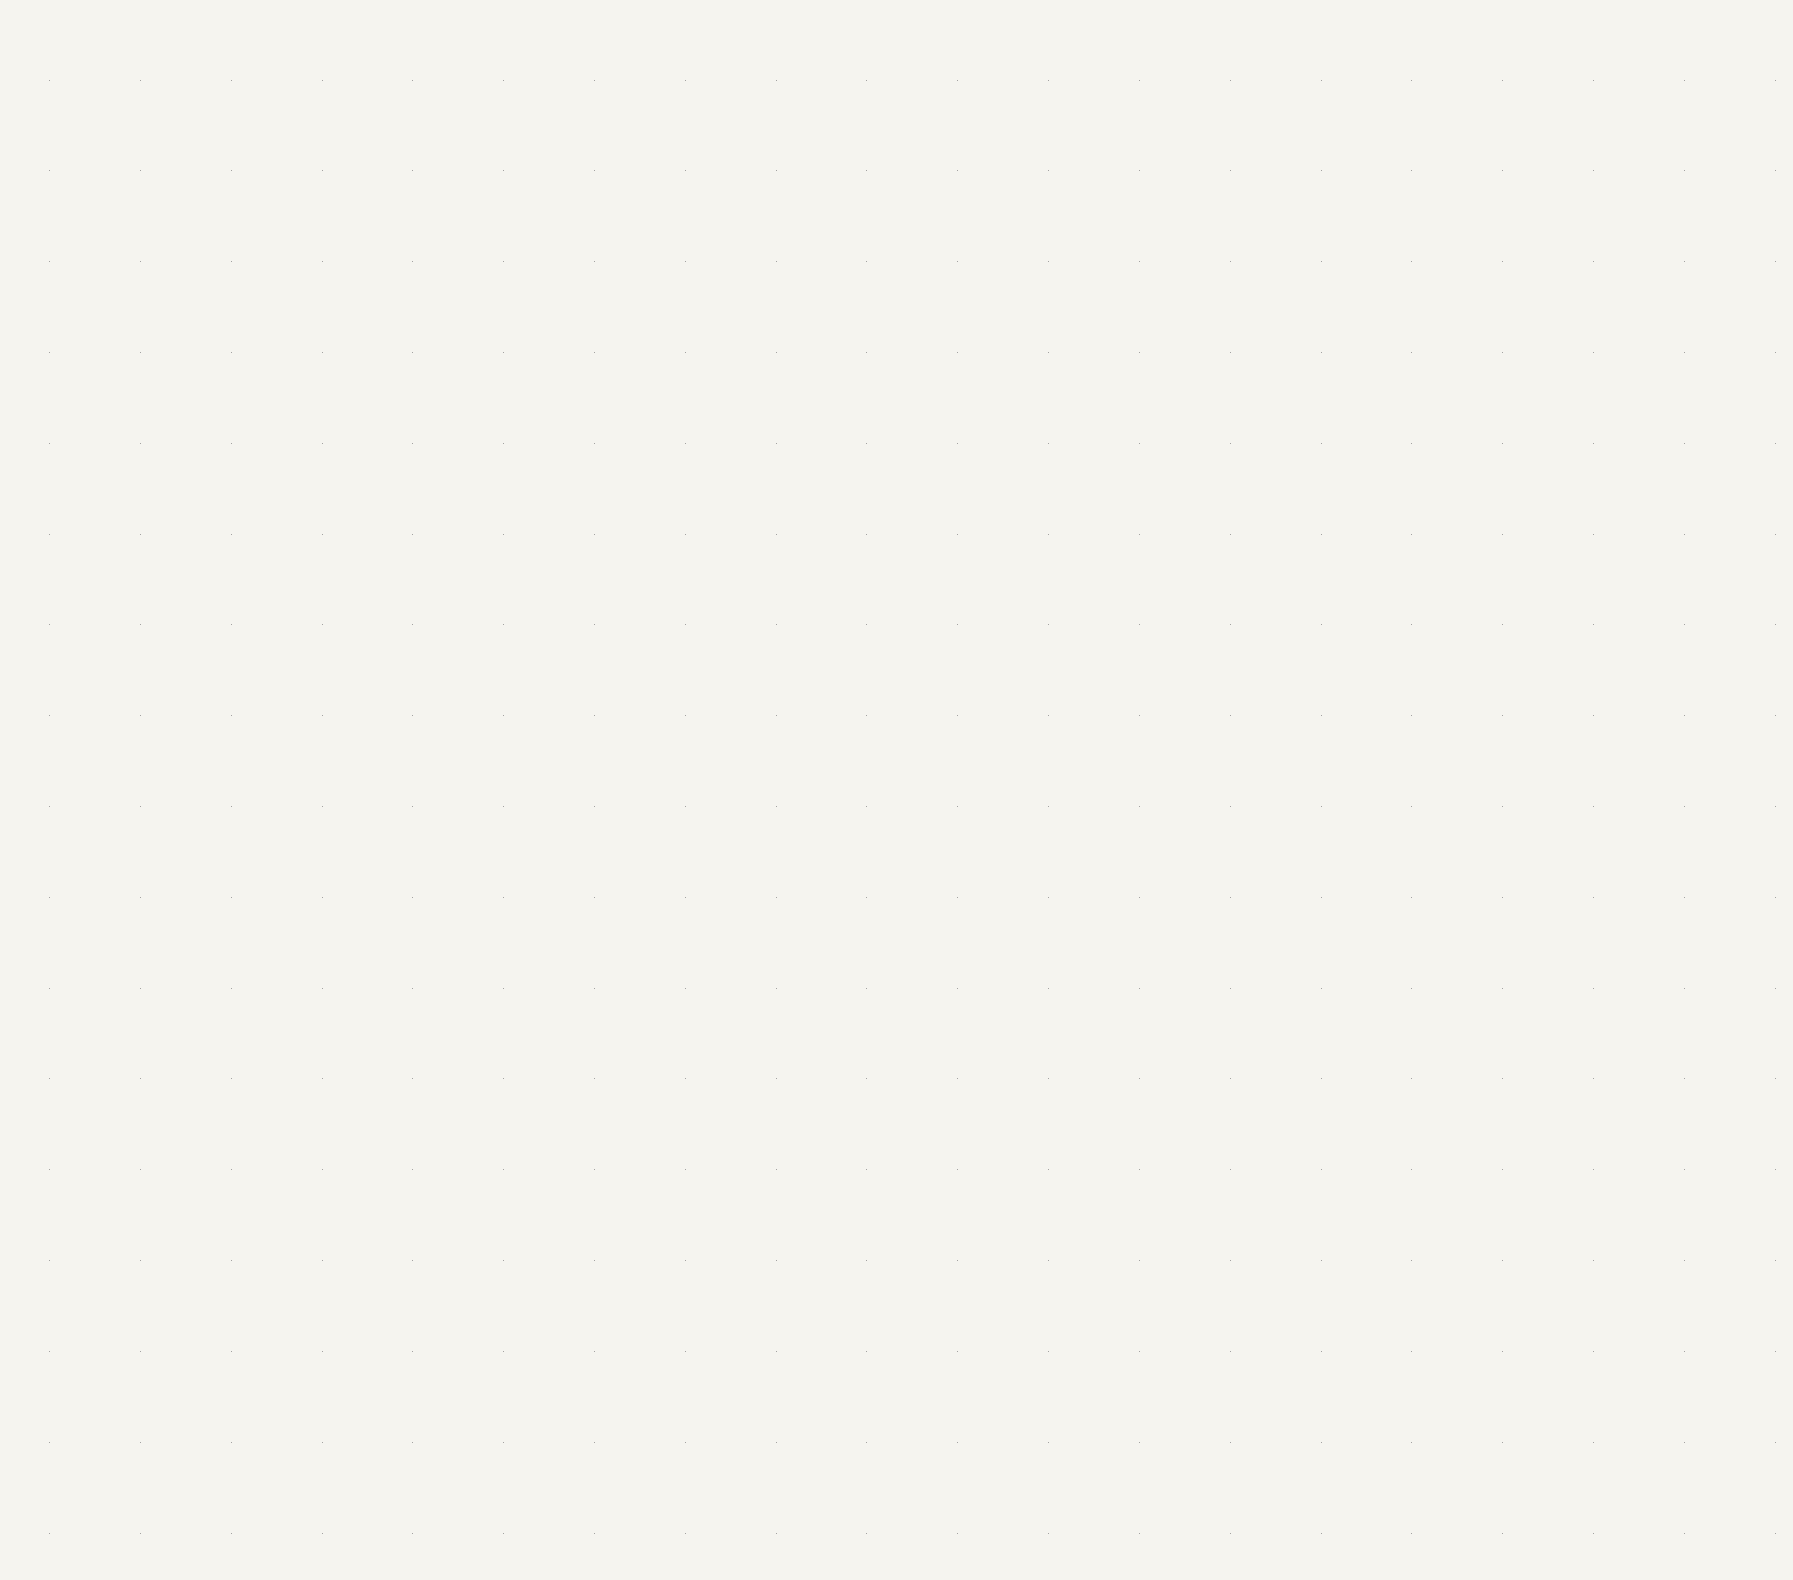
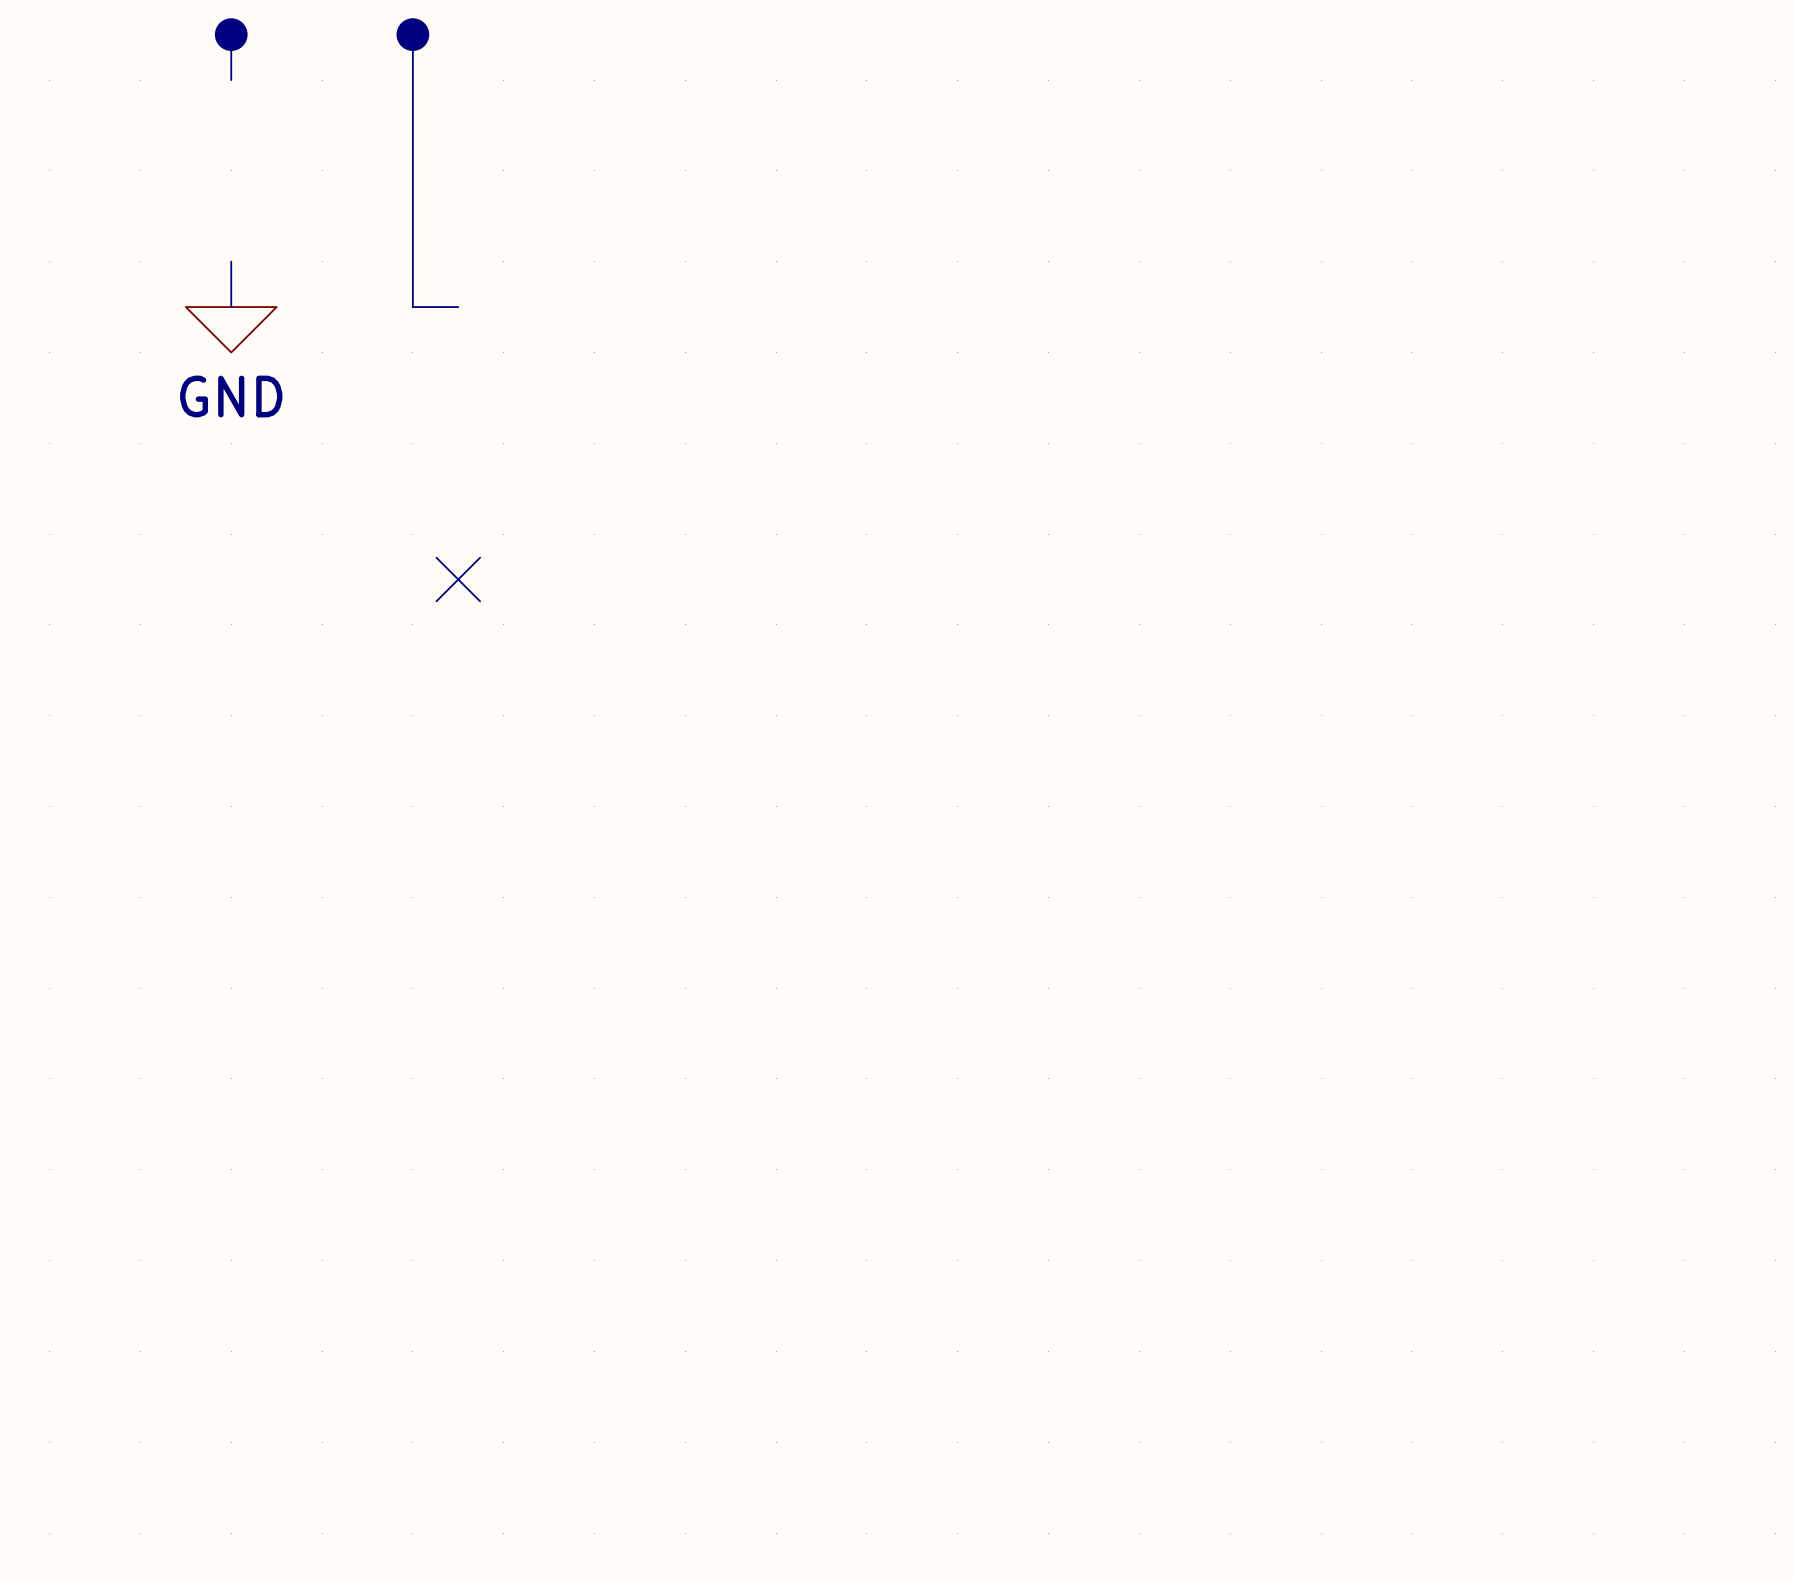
wire: none -> (231, 34) (231, 80)
junction: none -> (231, 34)
wire: none -> (412, 34) (412, 307) (458, 307)
junction: none -> (412, 34)
wire: none -> (231, 261) (231, 307)
power symbol: none -> GND (231, 329)
no-connect mark: none -> (458, 579)

